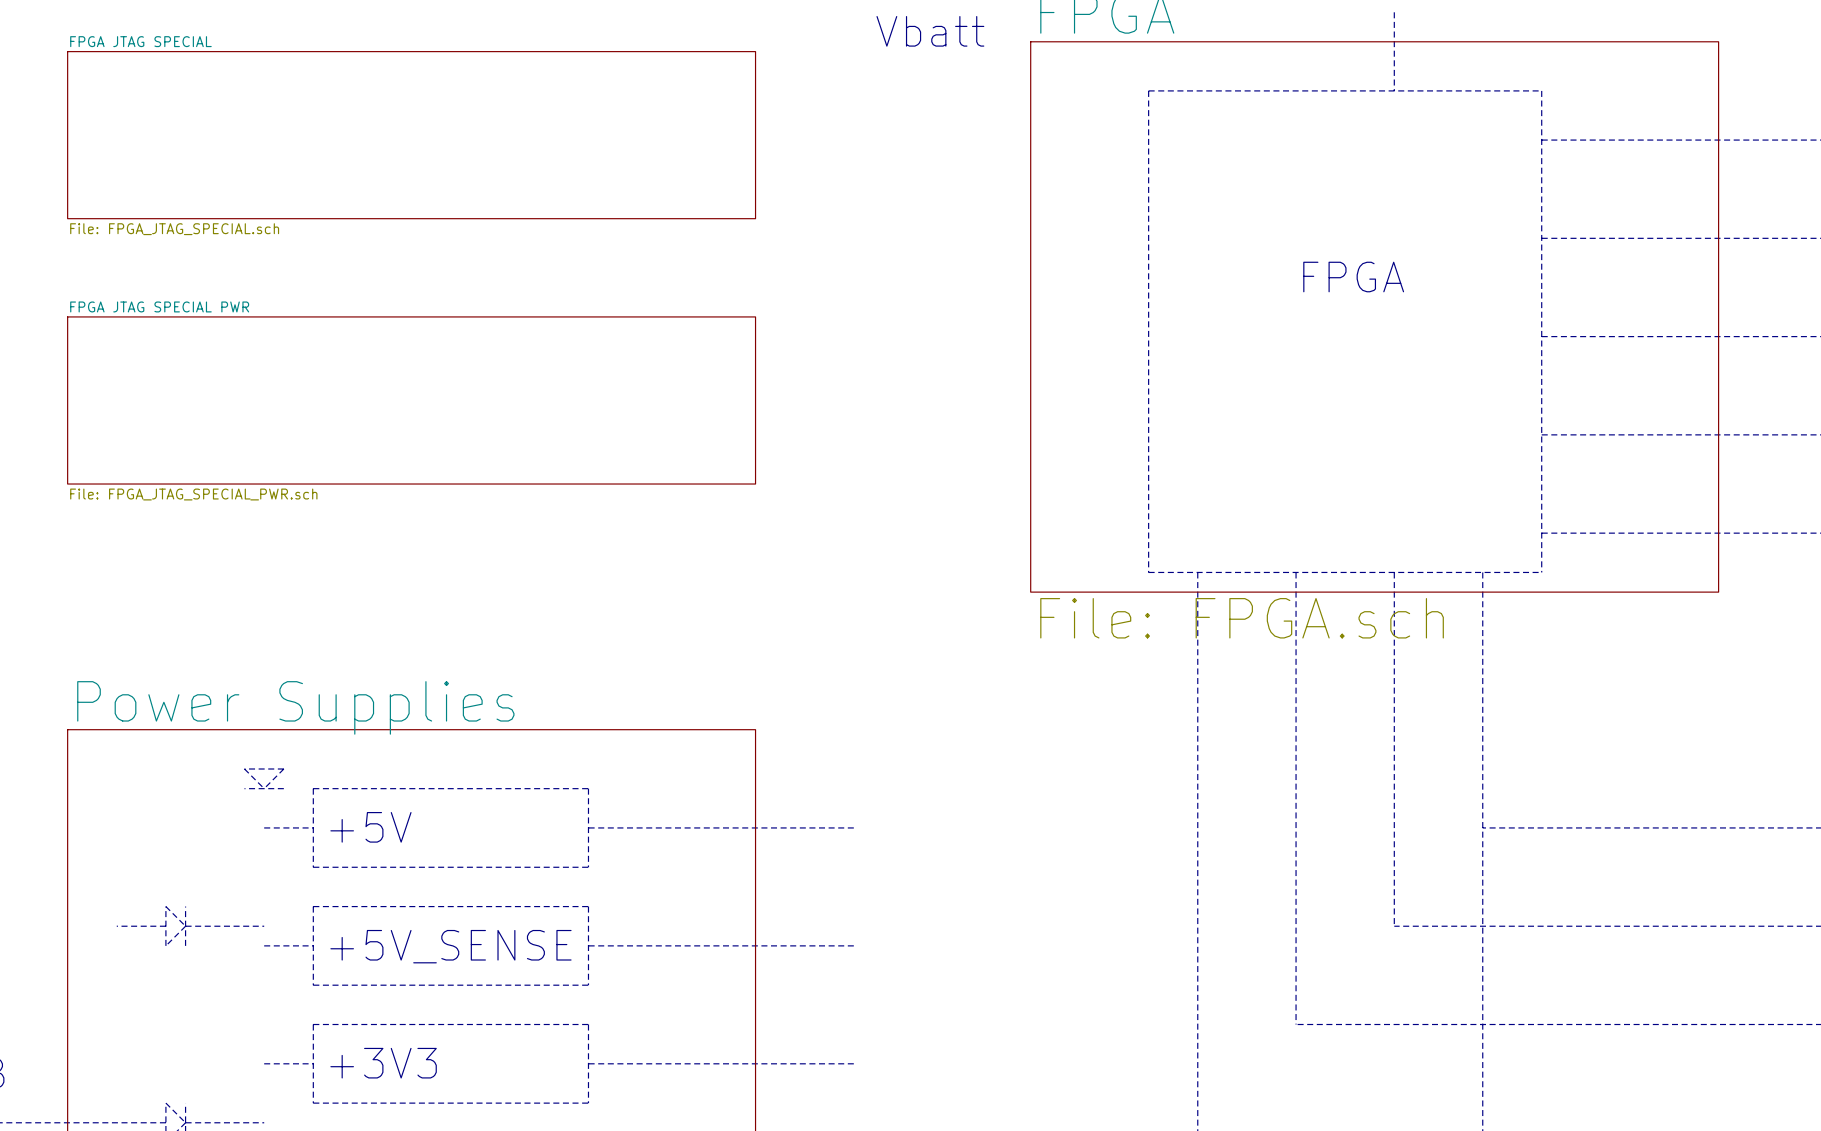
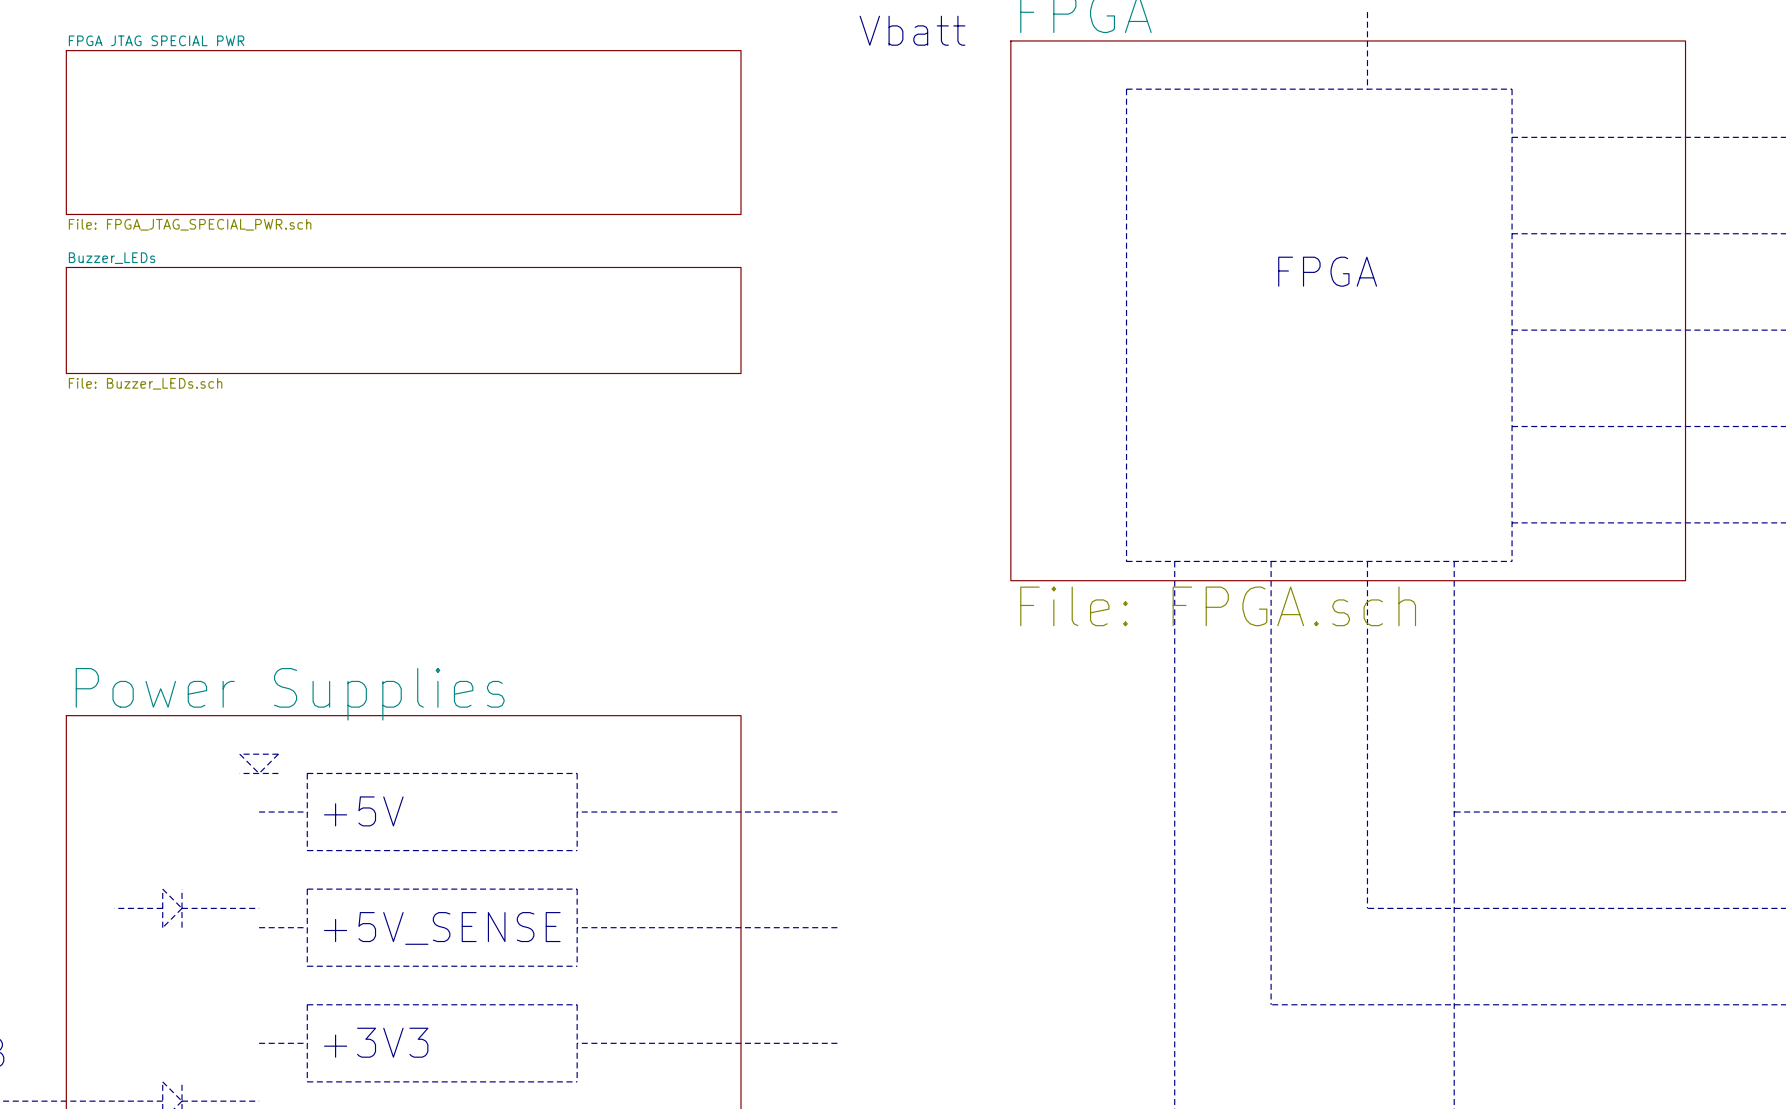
sheet FPGA JTAG SPECIAL name: FPGA JTAG SPECIAL (140, 41) -> FPGA JTAG SPECIAL PWR (156, 40)
sheet FPGA JTAG SPECIAL value: File: FPGA_JTAG_SPECIAL.sch (174, 229) -> File: FPGA_JTAG_SPECIAL_PWR.sch (190, 224)
sheet Buzzer_LEDs: none -> File: Buzzer_LEDs.sch (403, 320)
sheet FPGA JTAG SPECIAL PWR: File: FPGA_JTAG_SPECIAL_PWR.sch (411, 400) -> none

